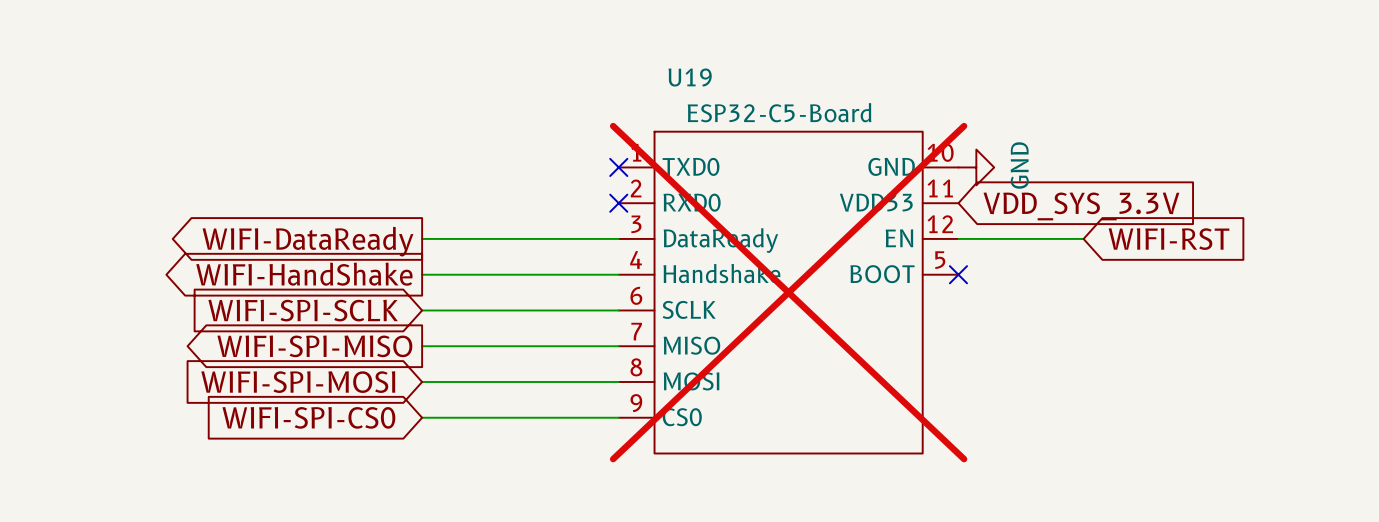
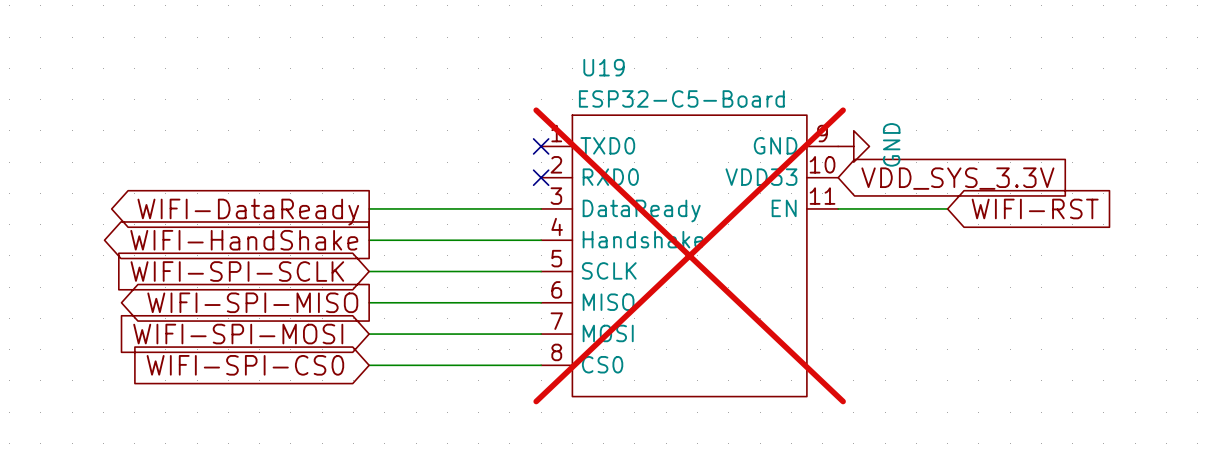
U19 symbol: [618, 131, 959, 454] -> [541, 115, 839, 397]
no-connect mark: (958, 274) -> none

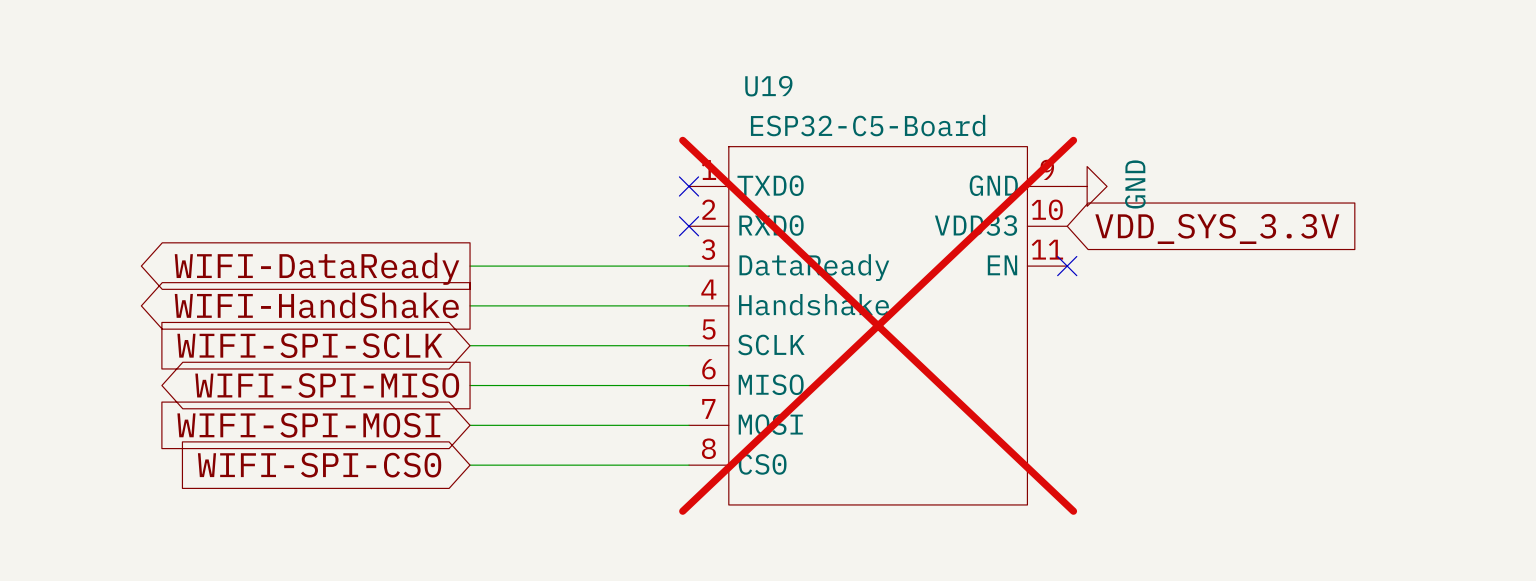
wire: (838, 208) (947, 208) -> none
no-connect mark: none -> (1067, 266)
global label: WIFI-RST (1035, 208) -> none

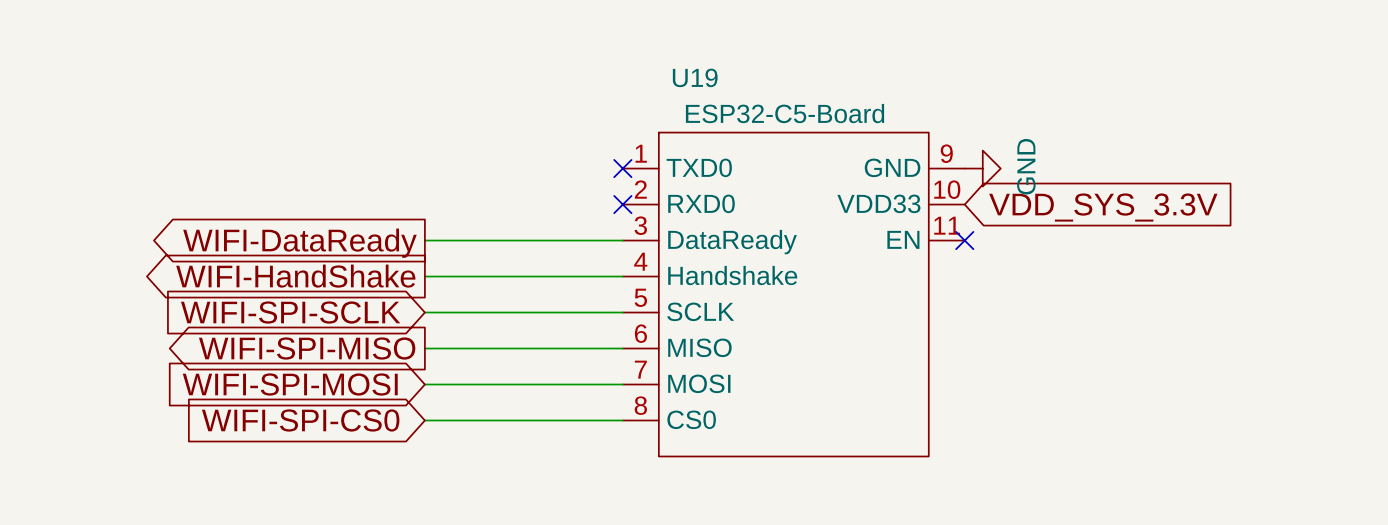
U19 do-not-place cross: (878, 325) -> none

